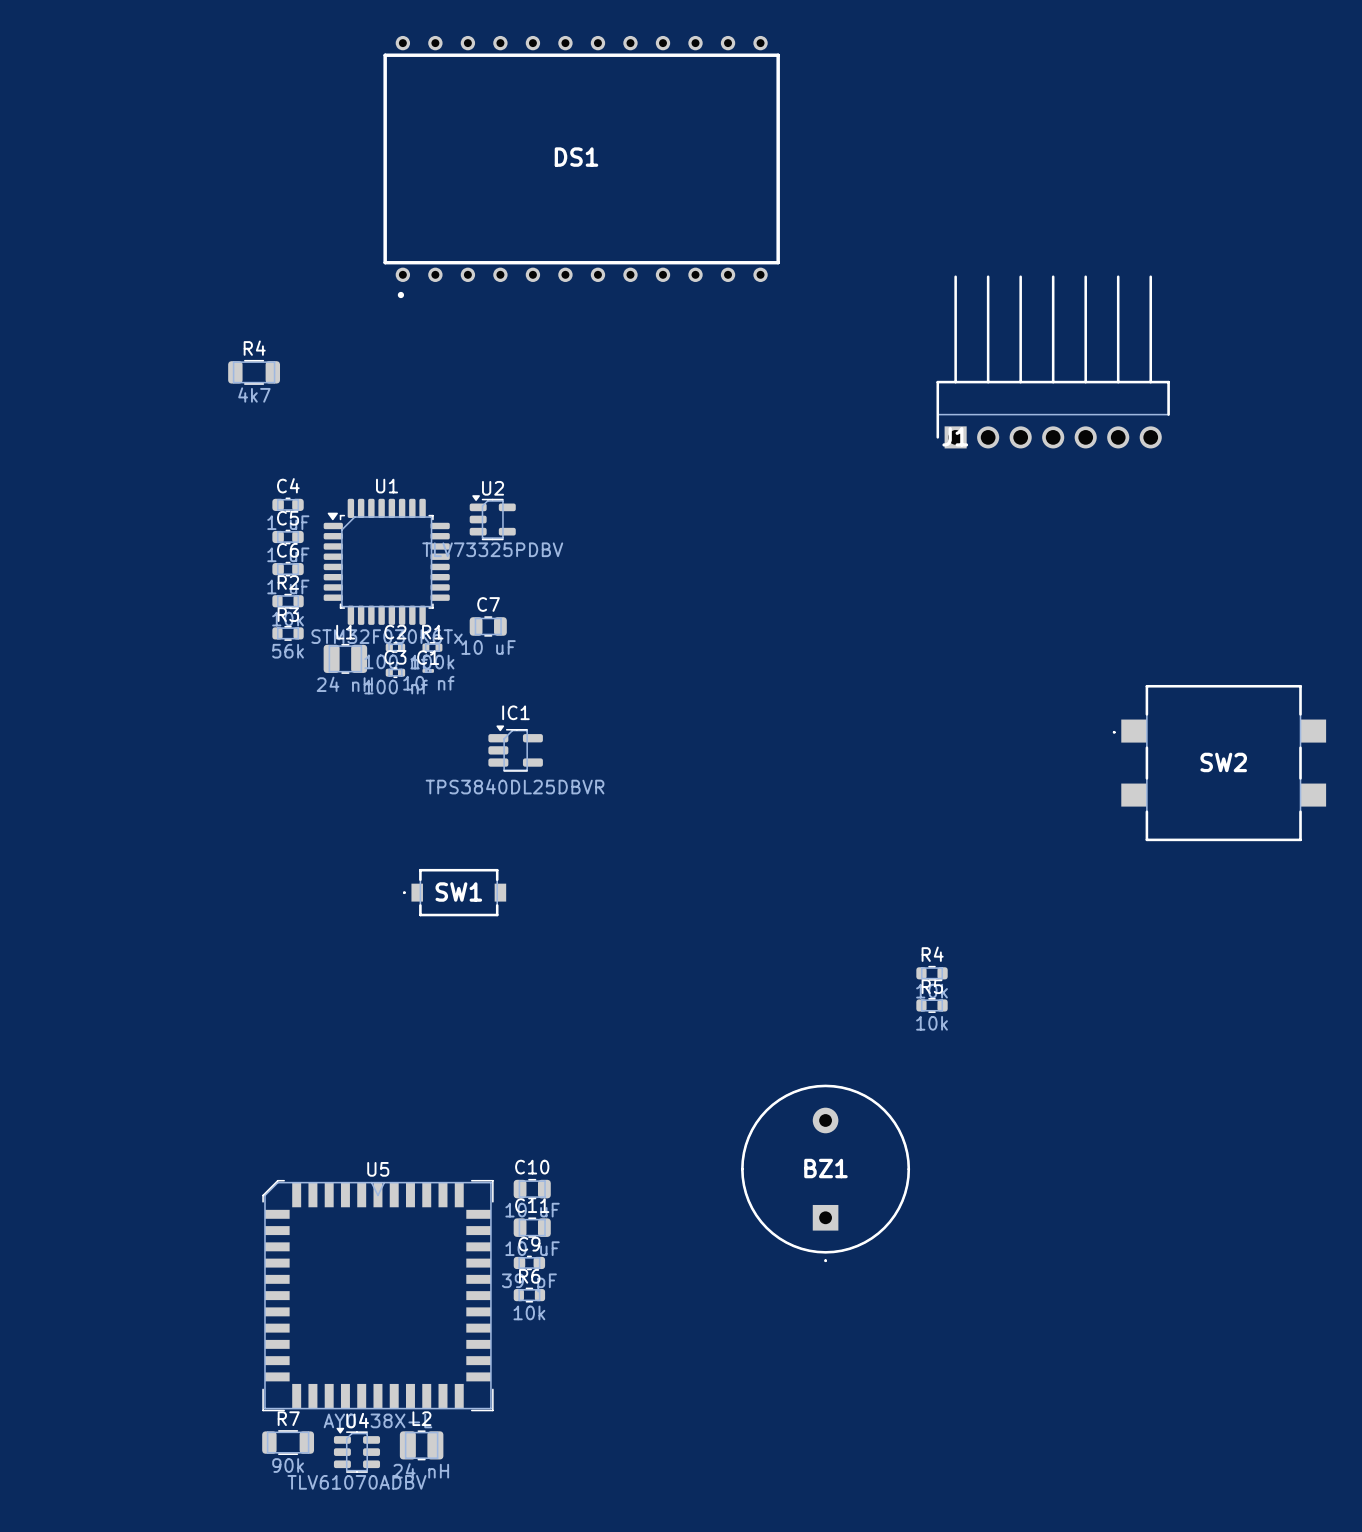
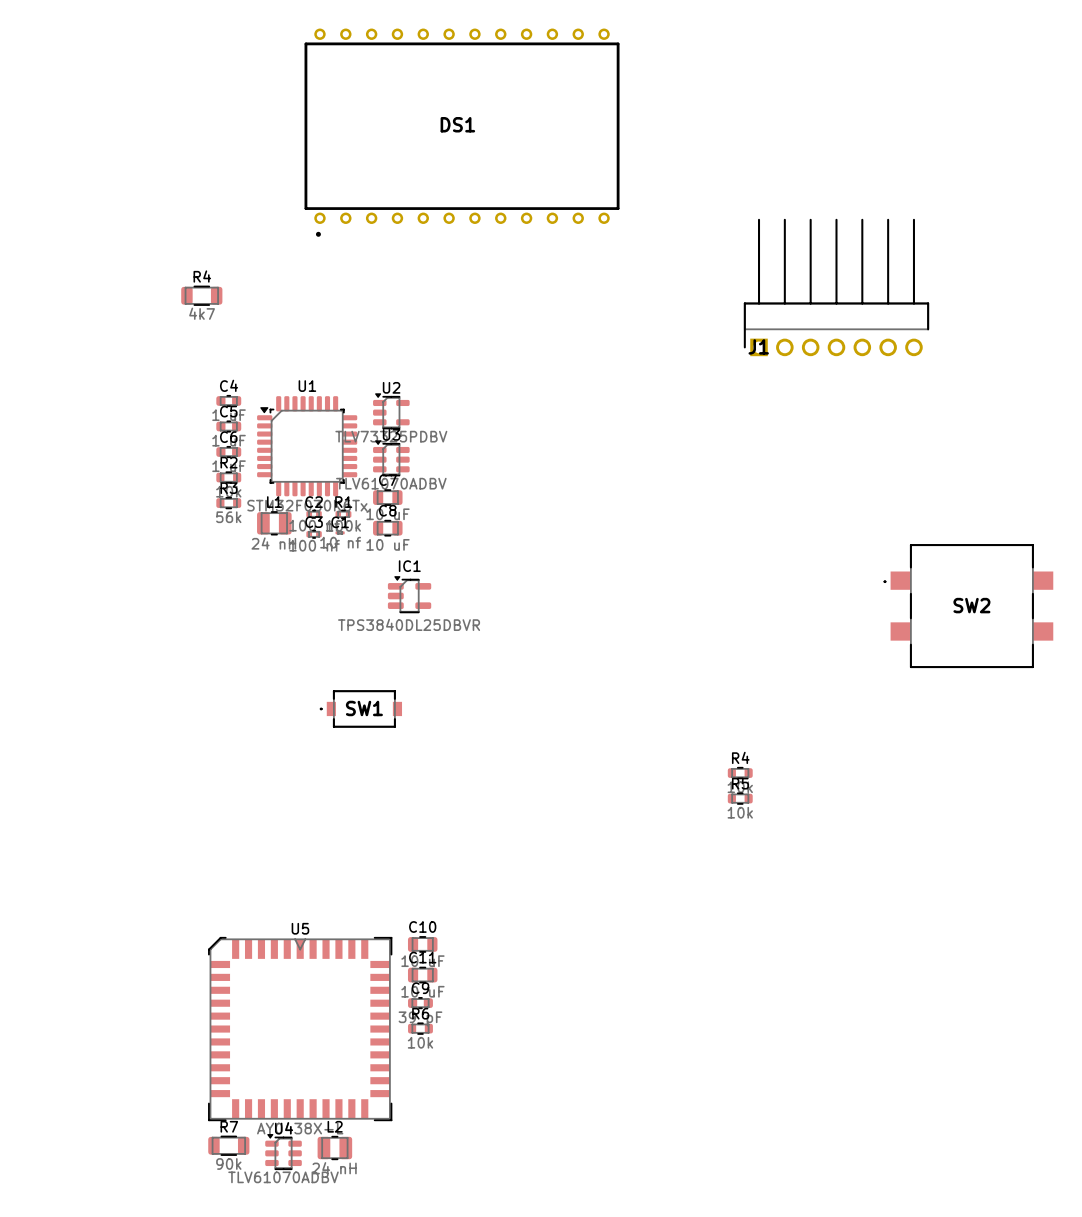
U3: none -> TLV61070ADBV (391, 458)
C8: none -> 10 uF (387, 528)
BZ1: (825, 1173) -> none

